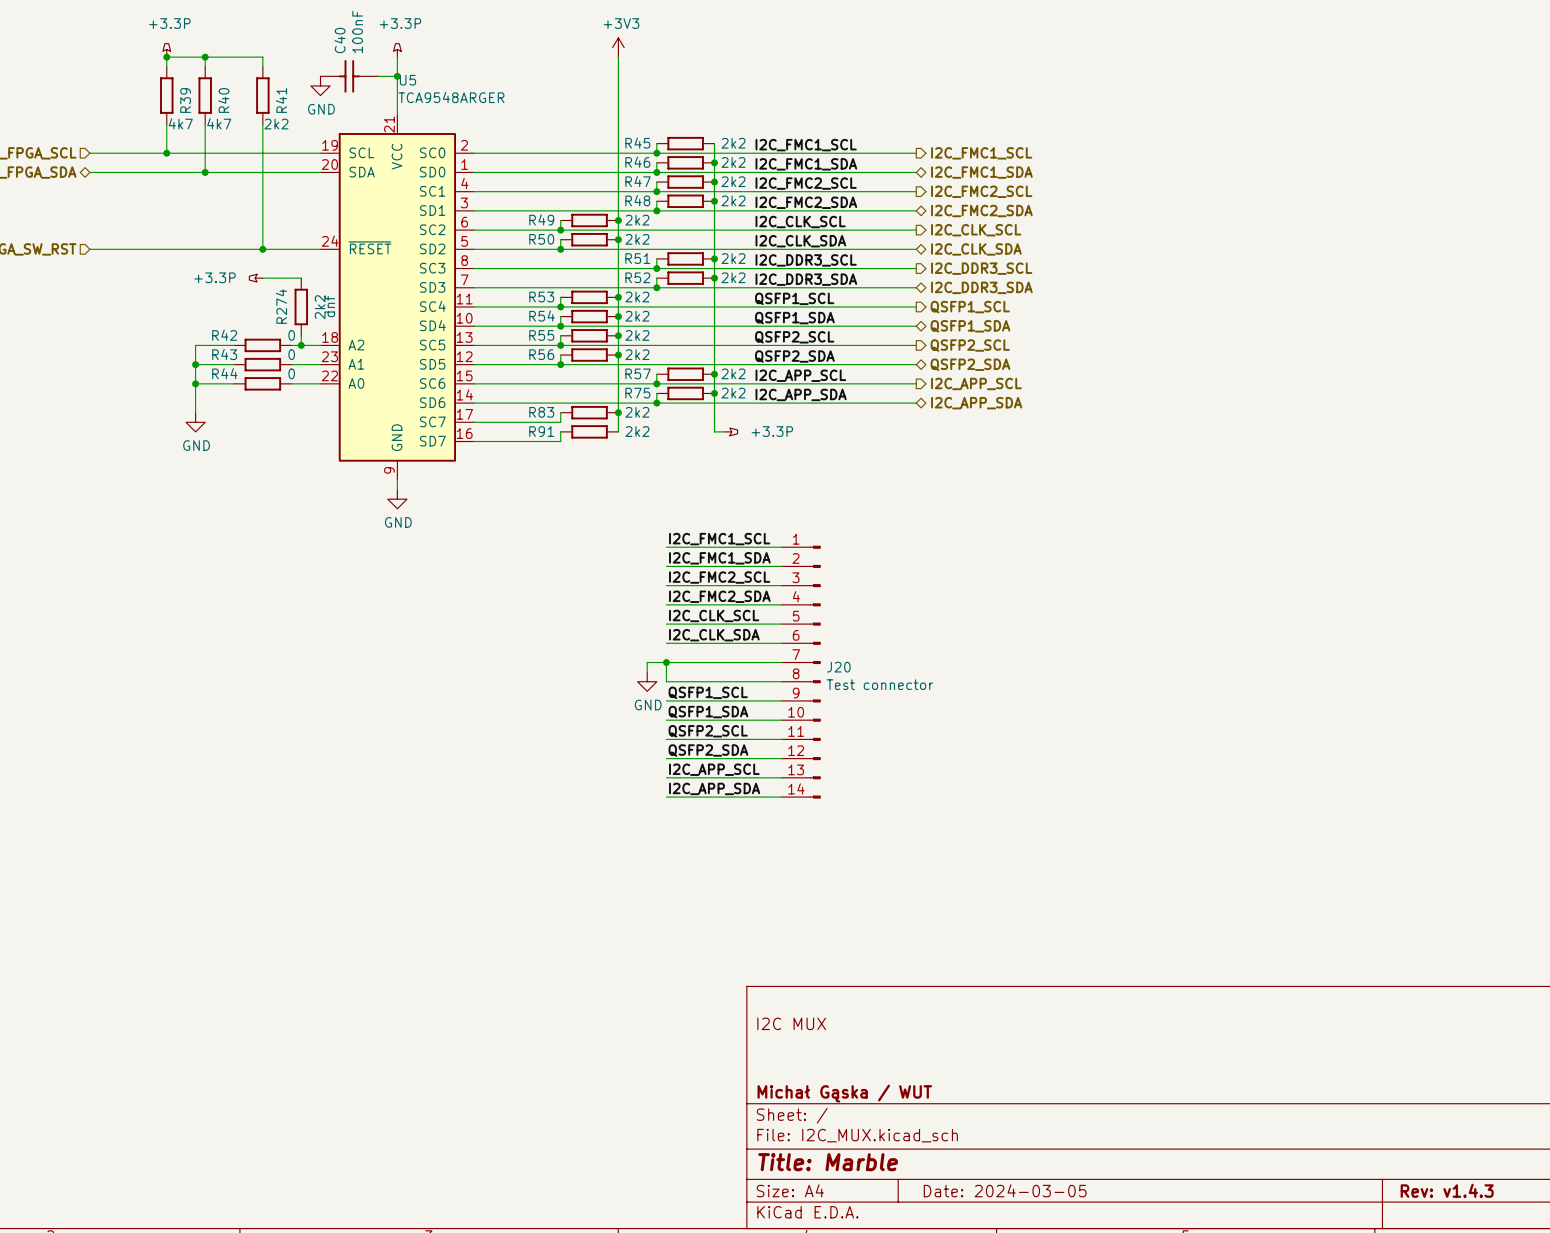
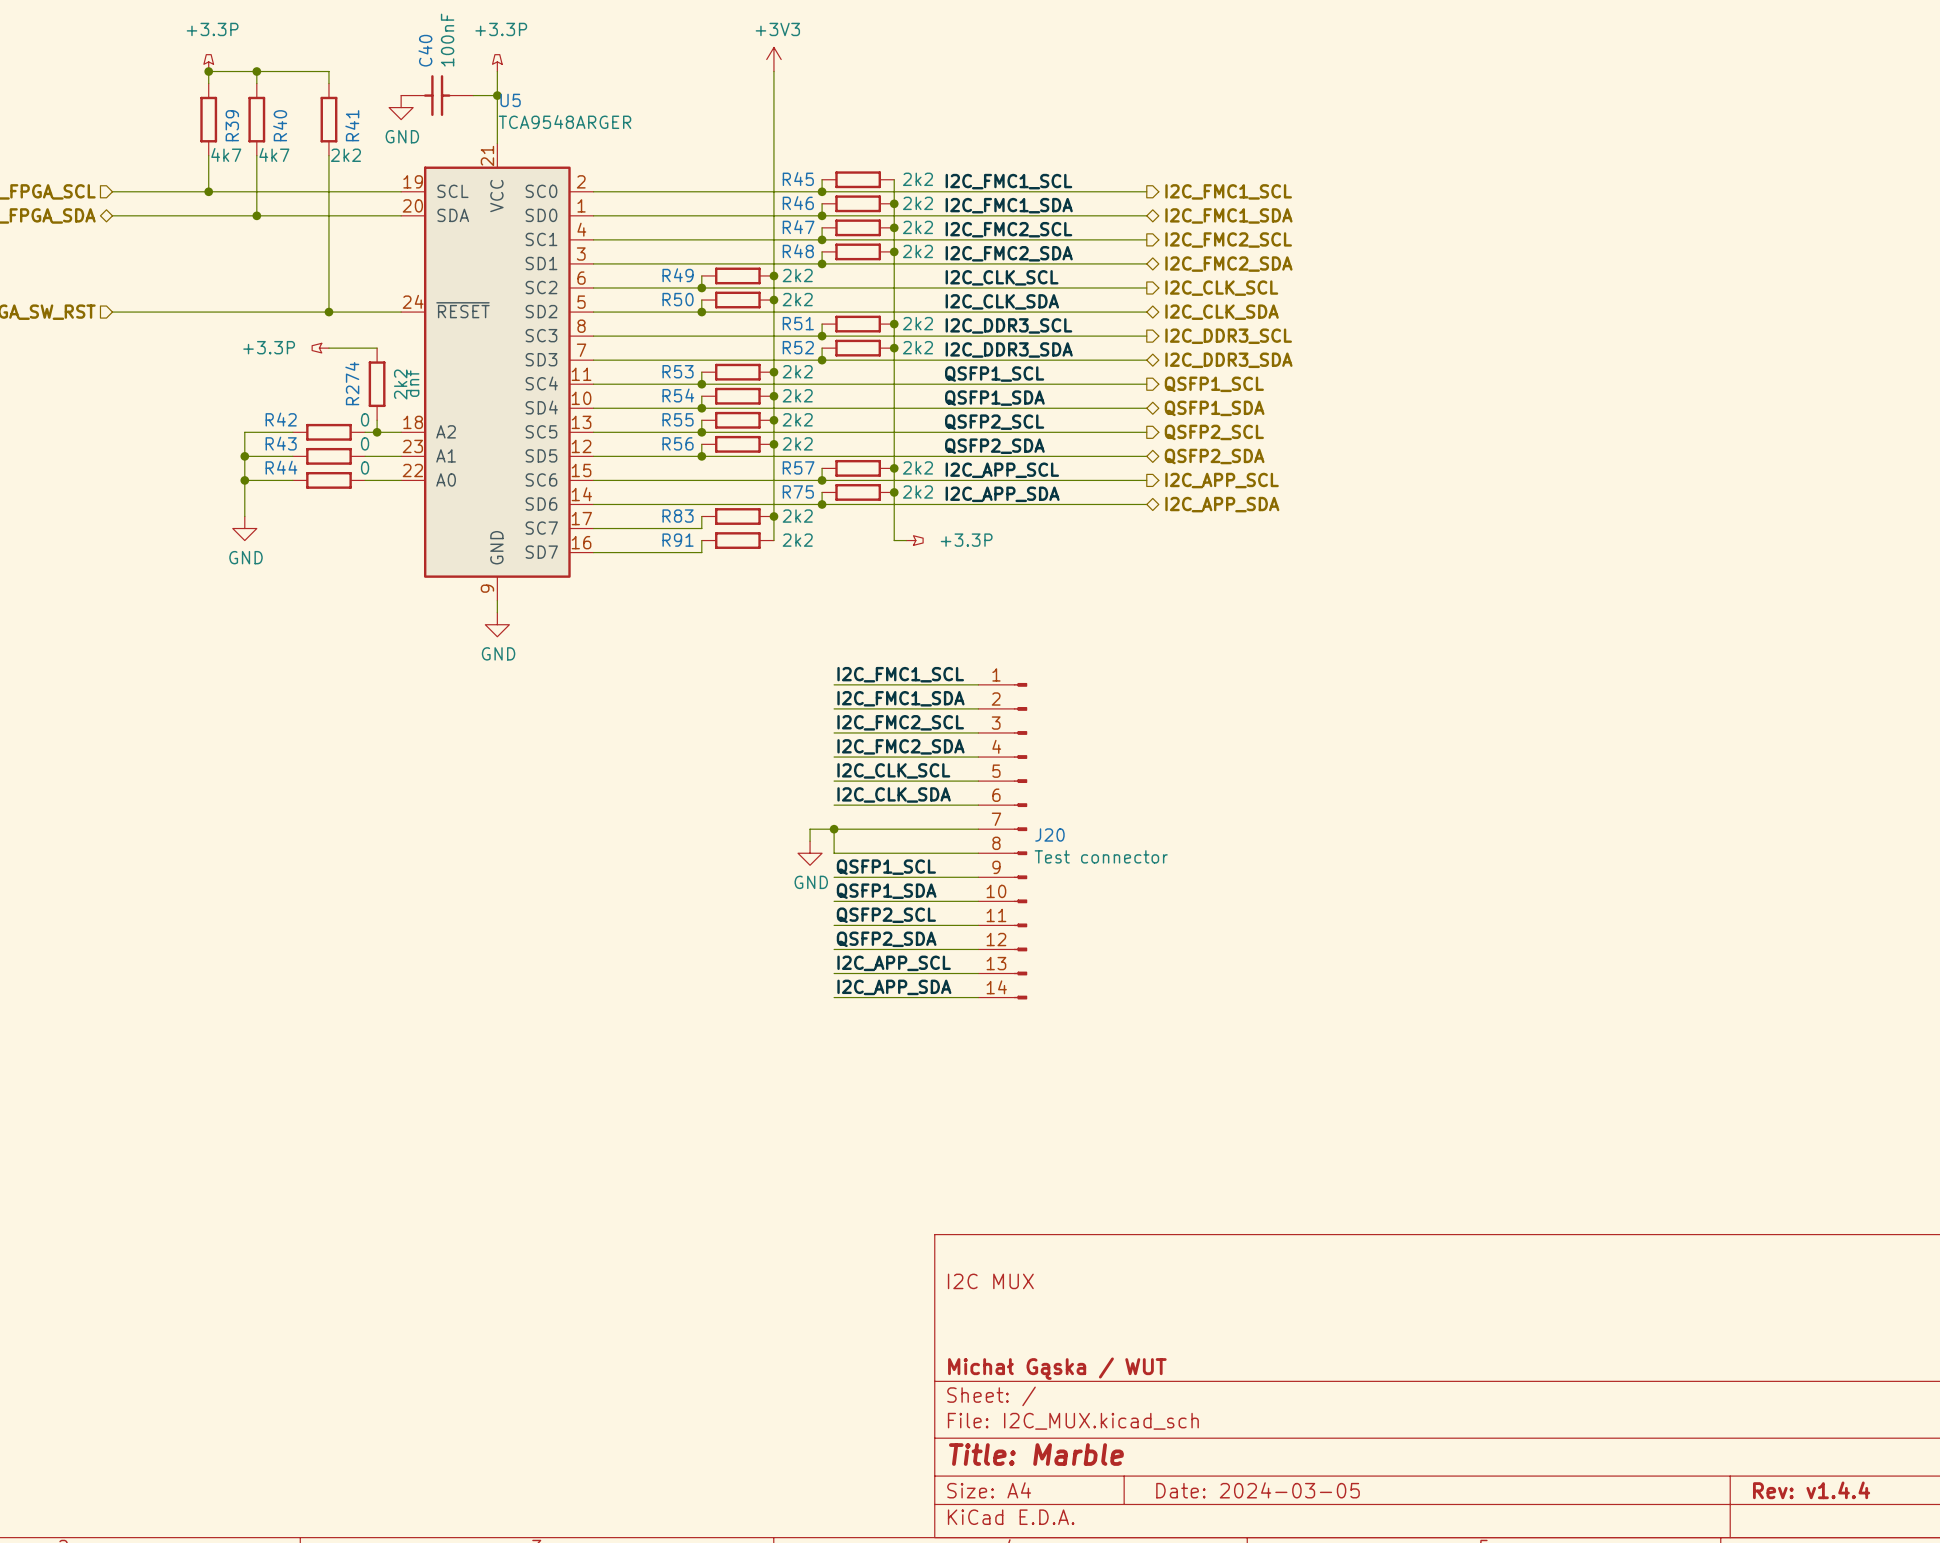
title block: Rev: v1.4.3 (1447, 1190) -> Rev: v1.4.4 (1811, 1490)

